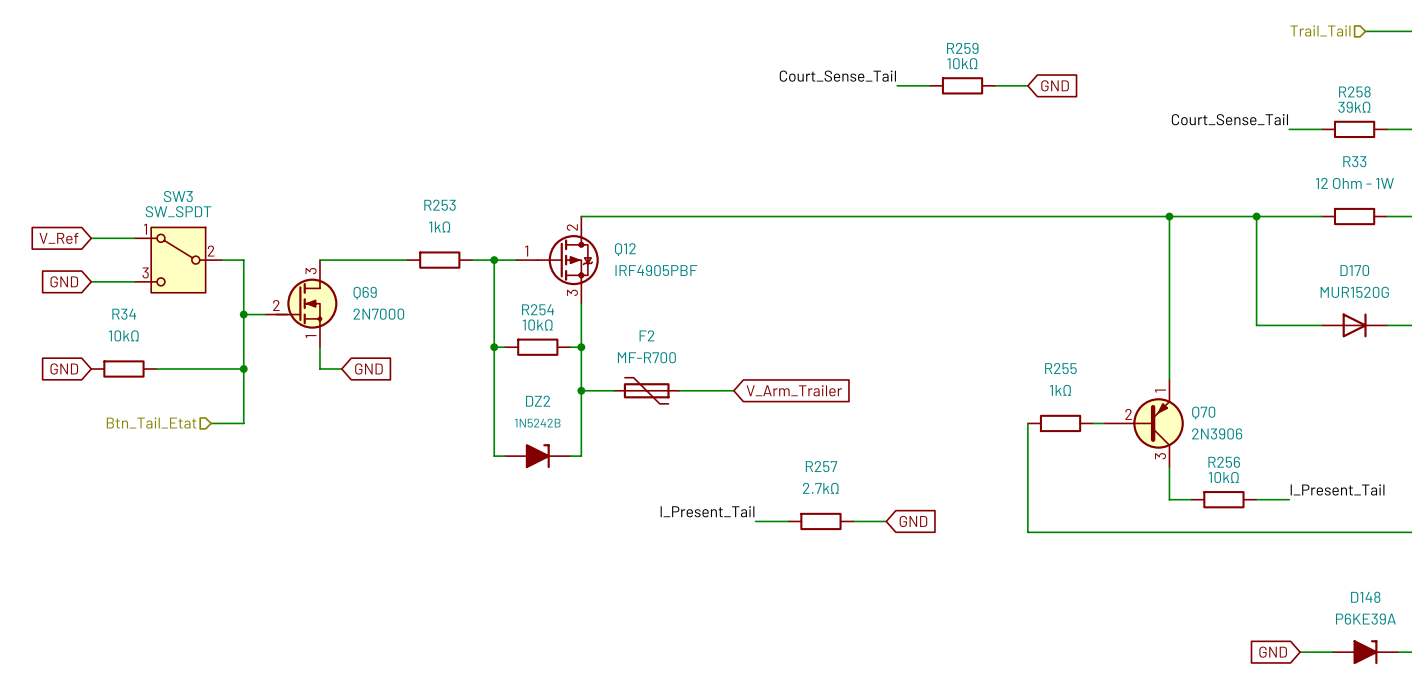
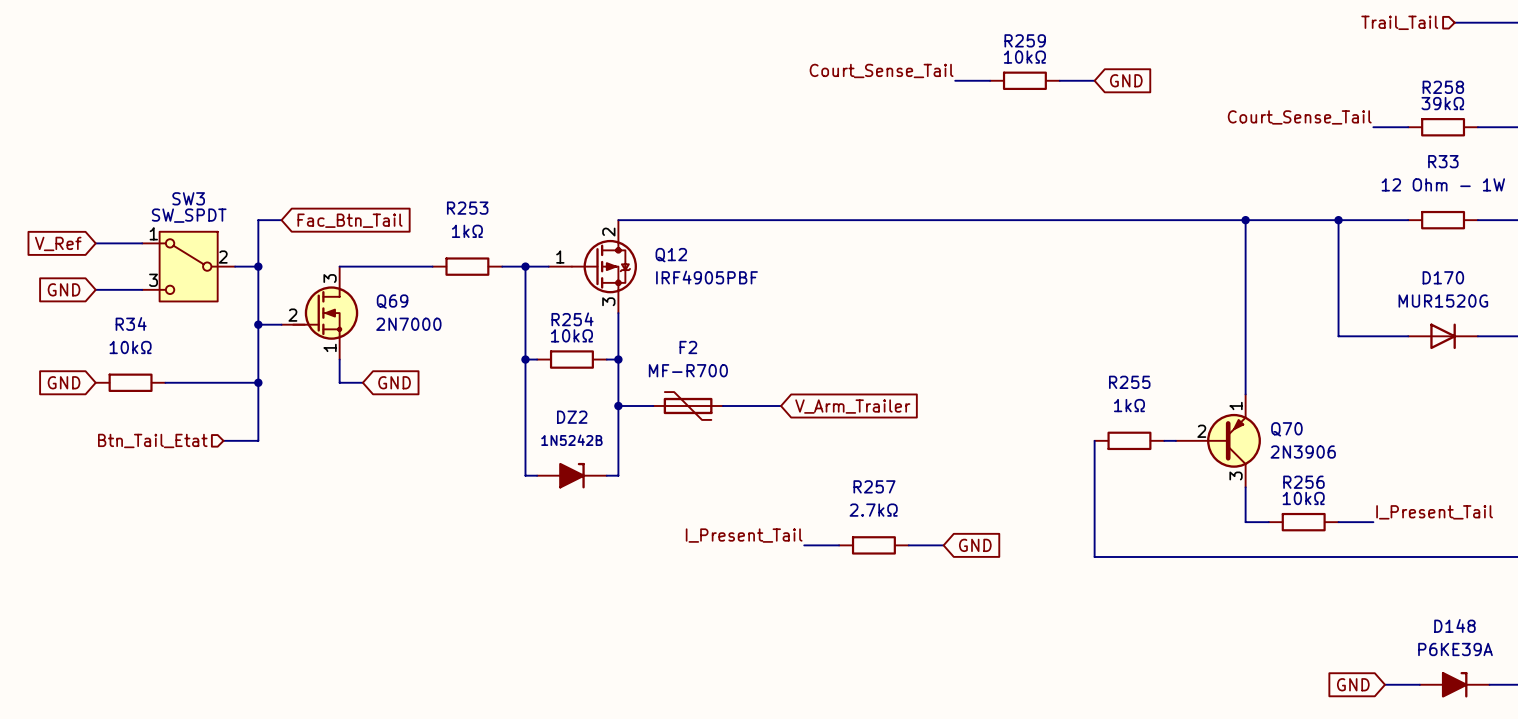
wire: none -> (281, 220) (258, 220) (258, 266)
global label: none -> Fac_Btn_Tail (350, 220)
junction: none -> (258, 266)

